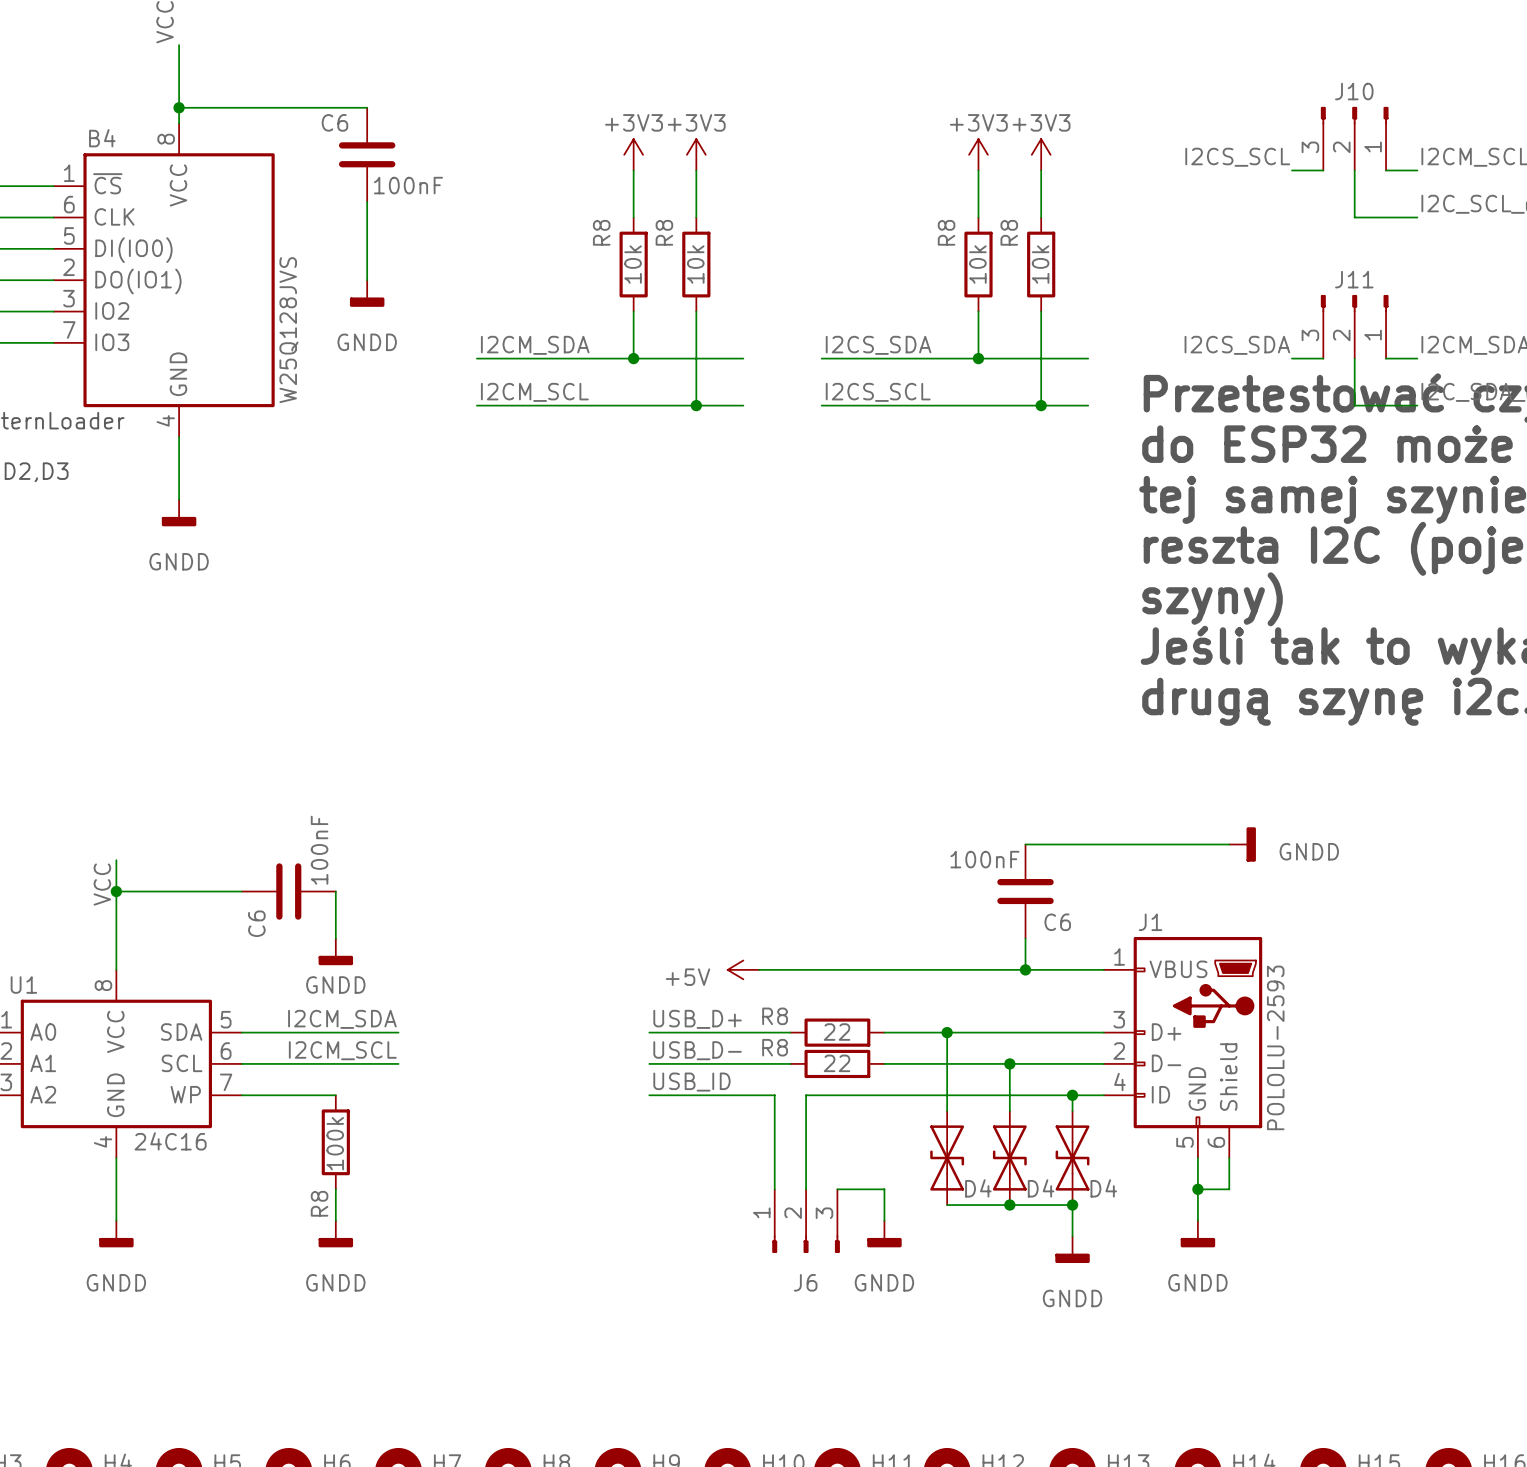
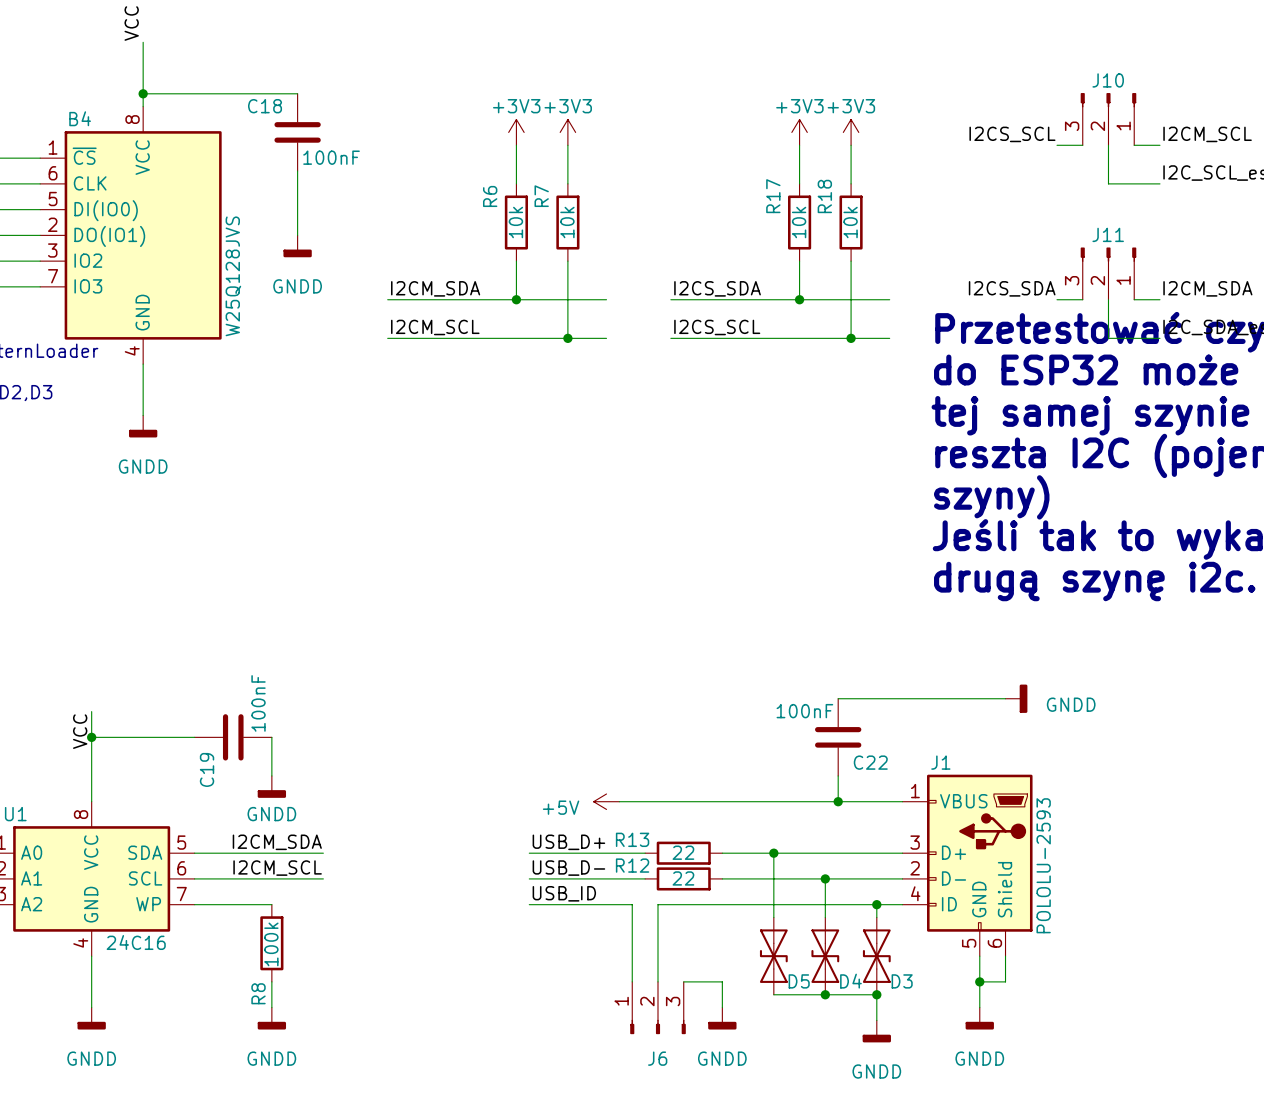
C6 name: C6 (334, 122) -> C18 (265, 106)
R8 name: R8 (601, 232) -> R6 (490, 196)
R8 name: R8 (664, 232) -> R7 (541, 196)
R8 name: R8 (946, 232) -> R17 (773, 196)
R8 name: R8 (1009, 232) -> R18 (824, 196)
C6 name: C6 (1057, 922) -> C22 (870, 762)
C6 name: C6 (256, 923) -> C19 (207, 769)
R8 name: R8 (775, 1016) -> R13 (632, 839)
R8 name: R8 (775, 1047) -> R12 (632, 865)
D4 name: D4 (978, 1188) -> D5 (799, 981)
D4 name: D4 (1103, 1188) -> D3 (902, 981)

